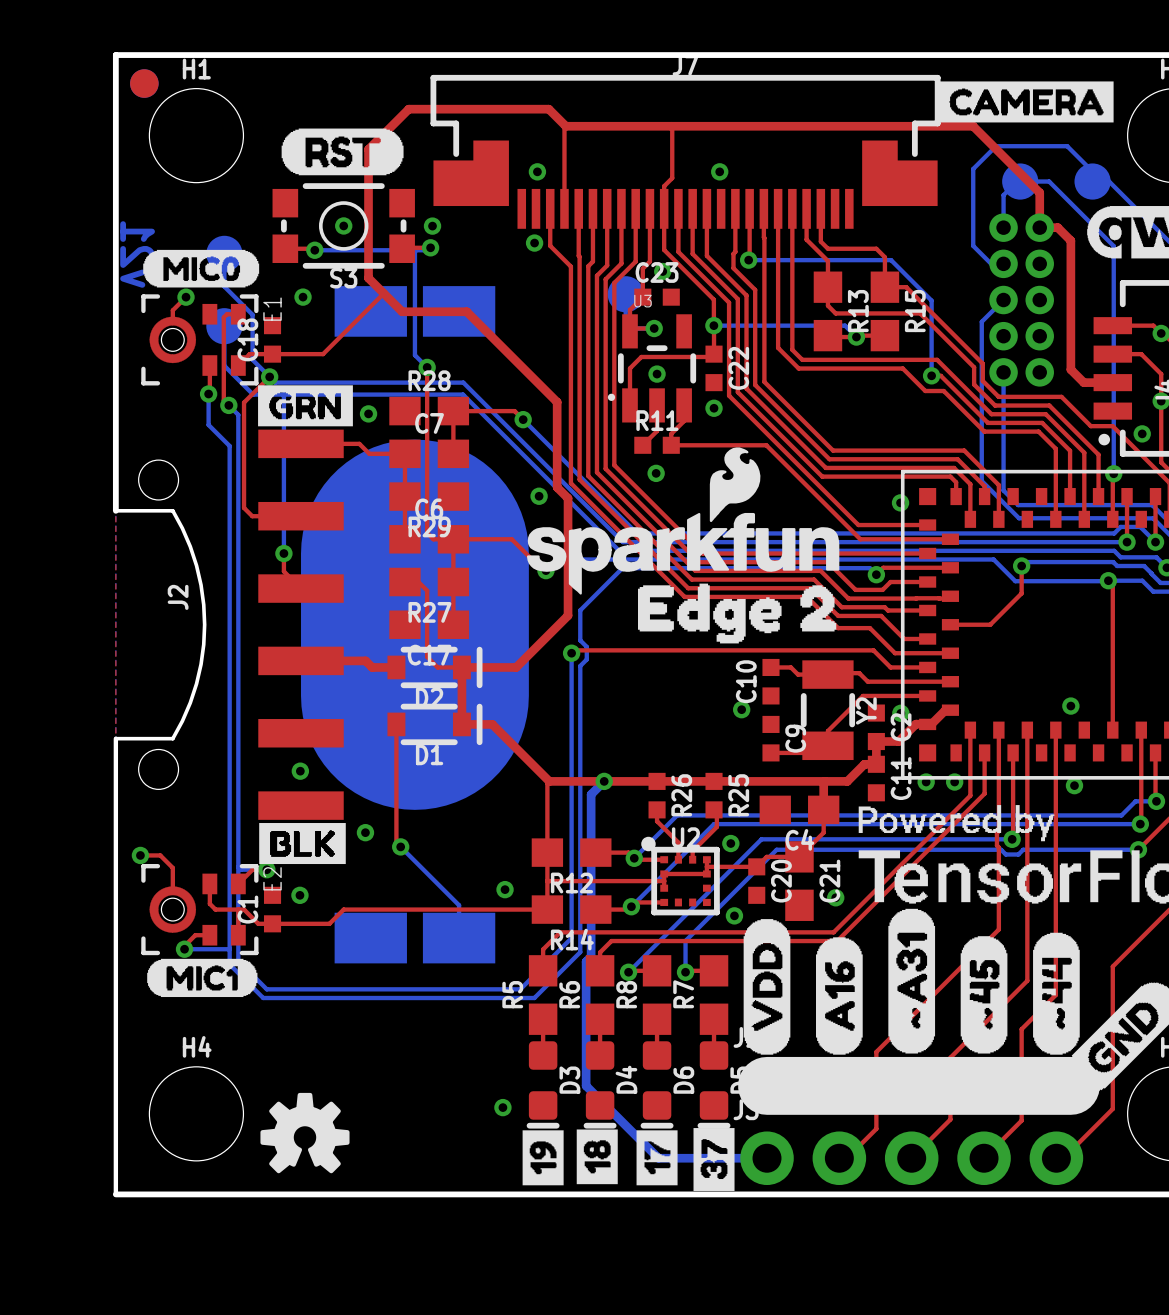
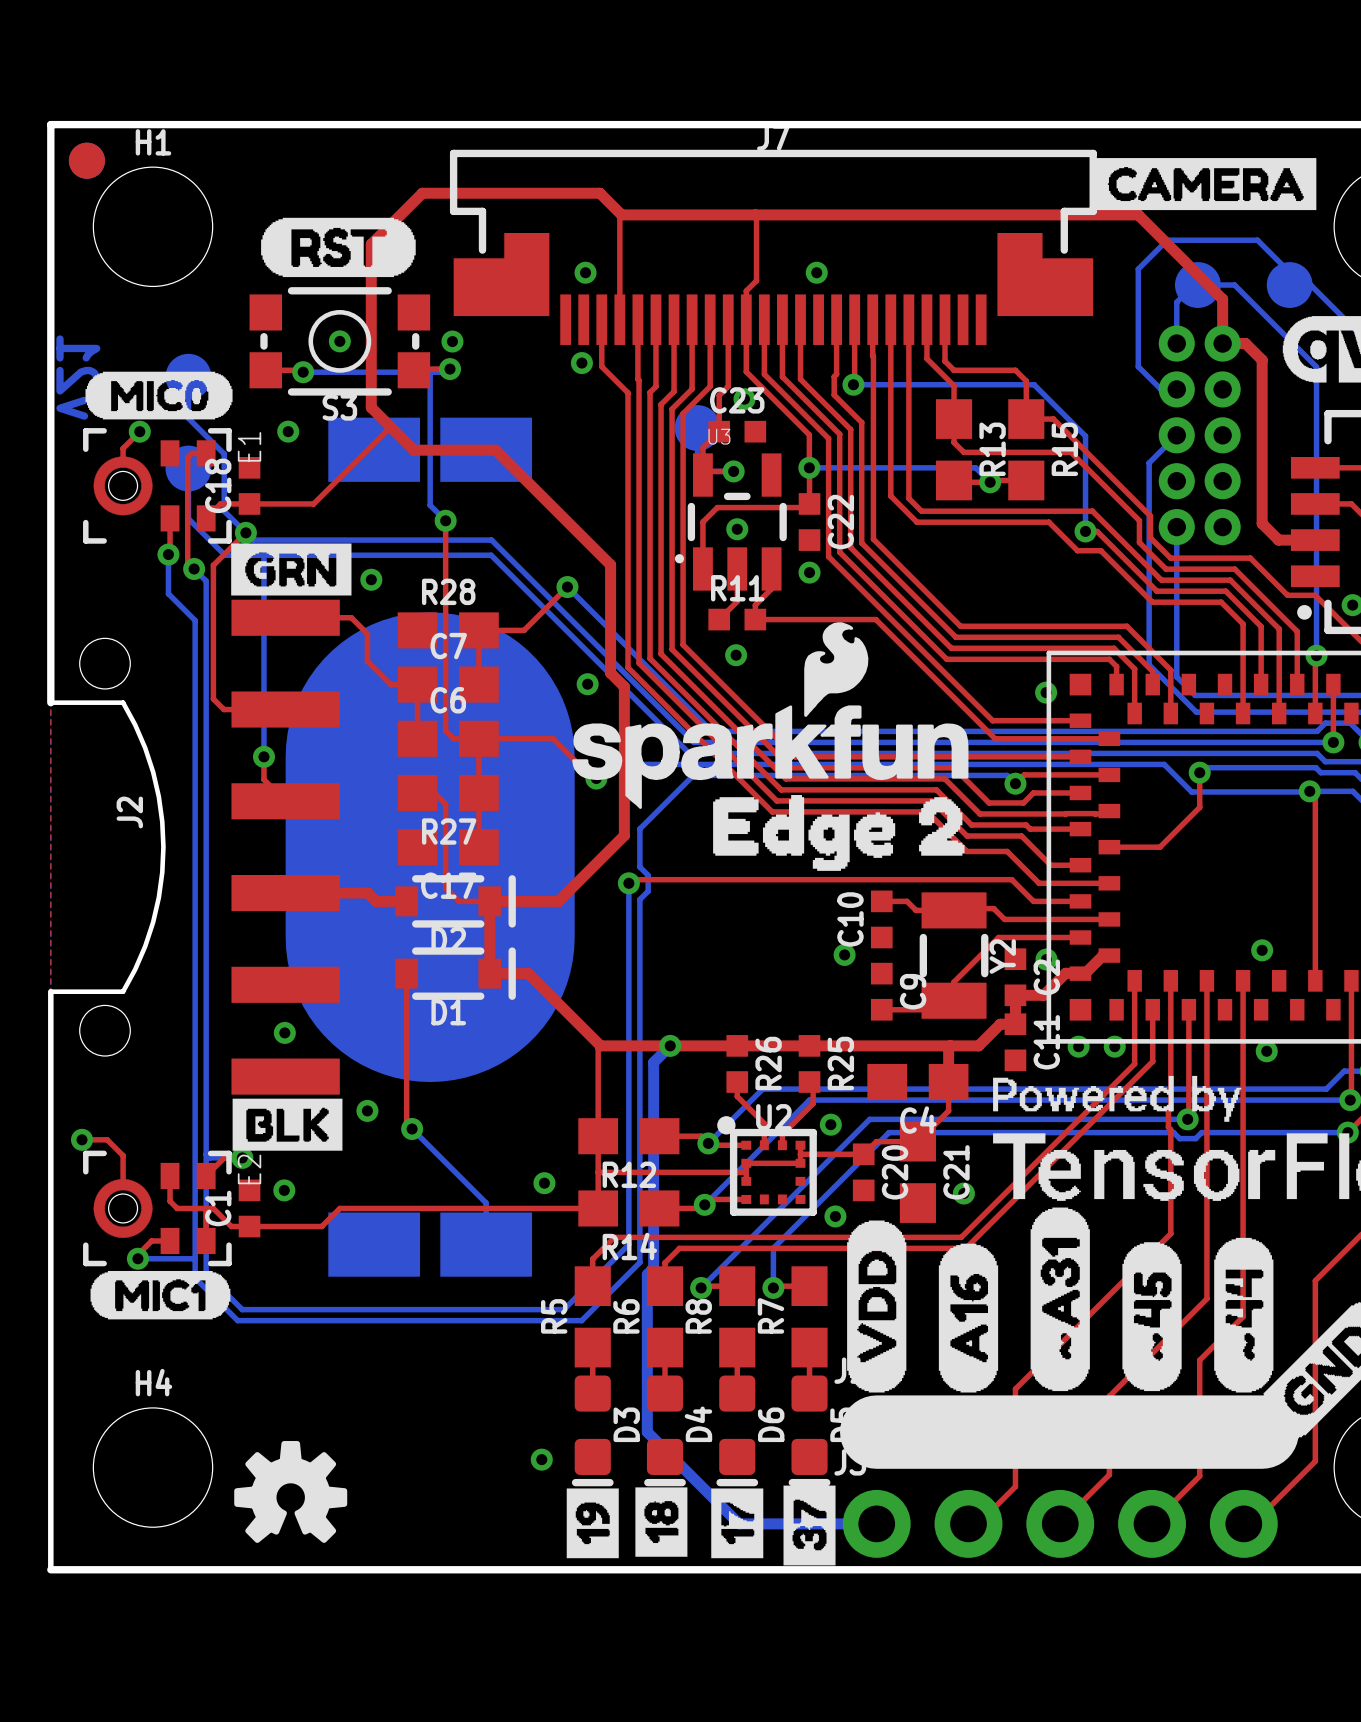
R28: (429, 411) -> none
top track: (523, 419) (514, 411) (453, 411) (453, 453) -> (567, 587) (524, 630) (478, 630) (478, 684)
C7 name: C7 (429, 423) -> R28 (448, 591)
top track: (352, 443) (359, 443) (369, 453) (404, 453) (404, 496) -> (351, 617) (367, 633) (367, 661) (390, 684) (417, 684)
R29 name: R29 (429, 526) -> C7 (448, 646)

